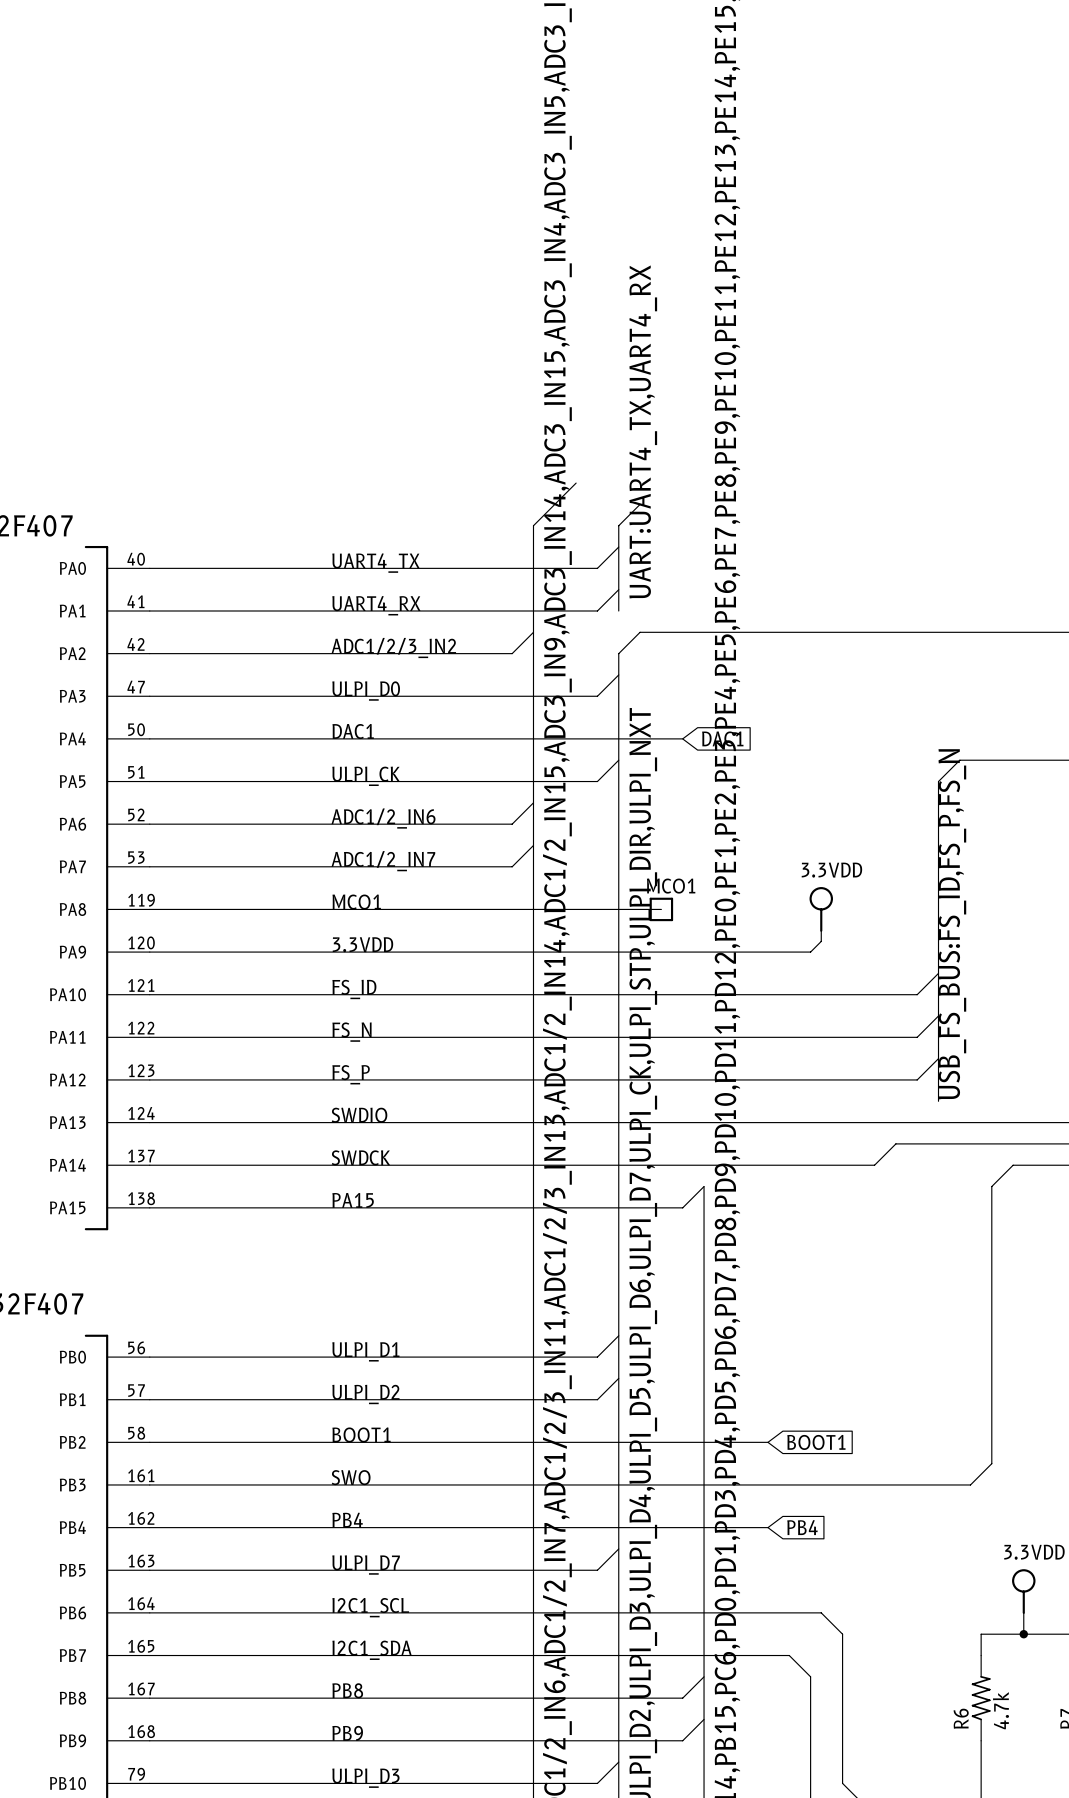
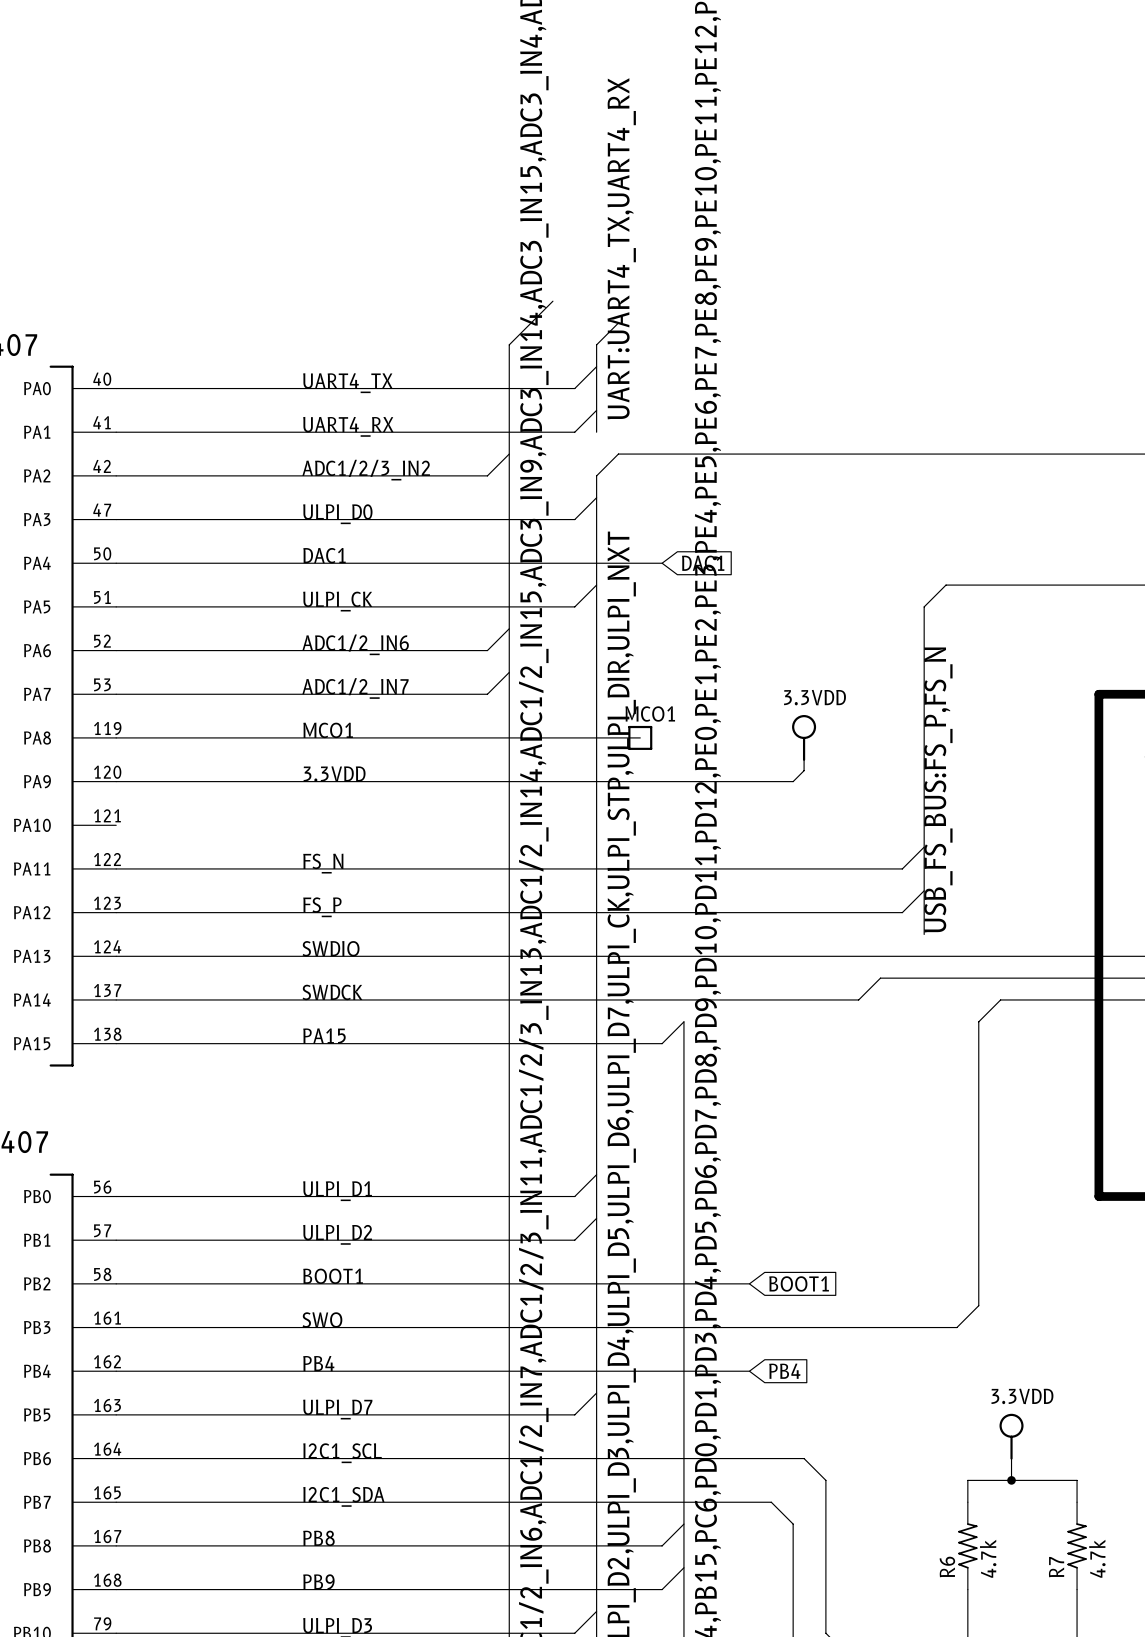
label: USB_FS_BUS:FS_ID,FS_P,FS_N (952, 924) -> USB_FS_BUS:FS_P,FS_N (938, 790)
wire: (938, 973) (917, 994) (149, 994) -> none
label: FS_ID (354, 989) -> none

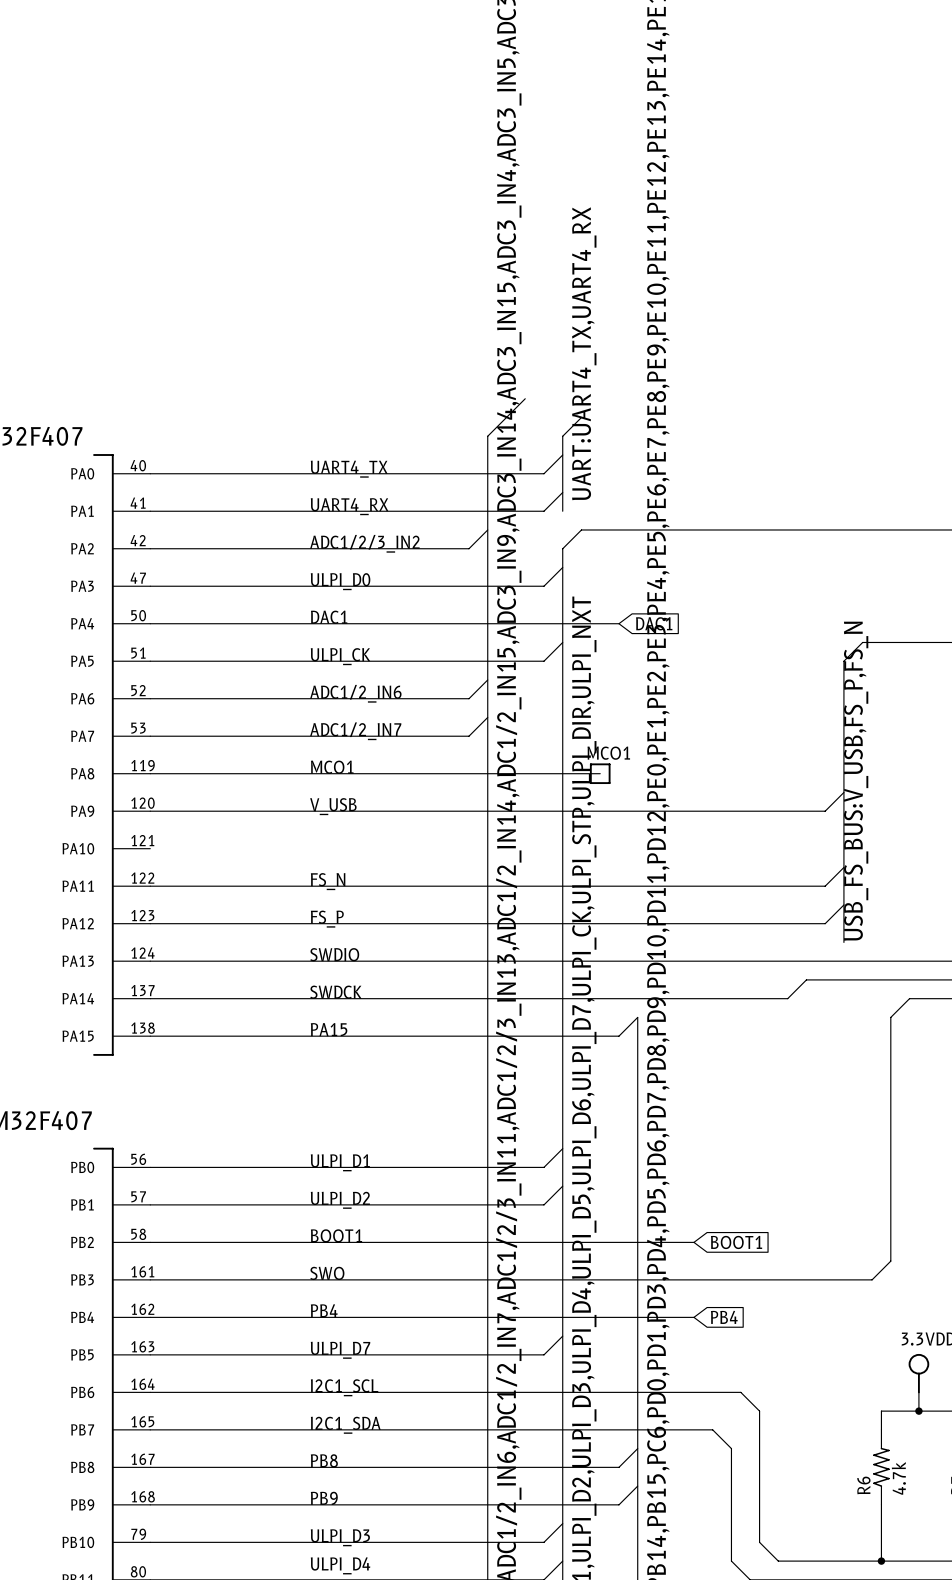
power symbol: 3.3VDD (804, 737) -> none
wire: (804, 759) (804, 770) (793, 781) -> (843, 792) (825, 811) (731, 811)
label: 3.3VDD (334, 774) -> V_USB (333, 806)
label: USB_FS_BUS:FS_P,FS_N (938, 790) -> USB_FS_BUS:V_USB,FS_P,FS_N (856, 781)

